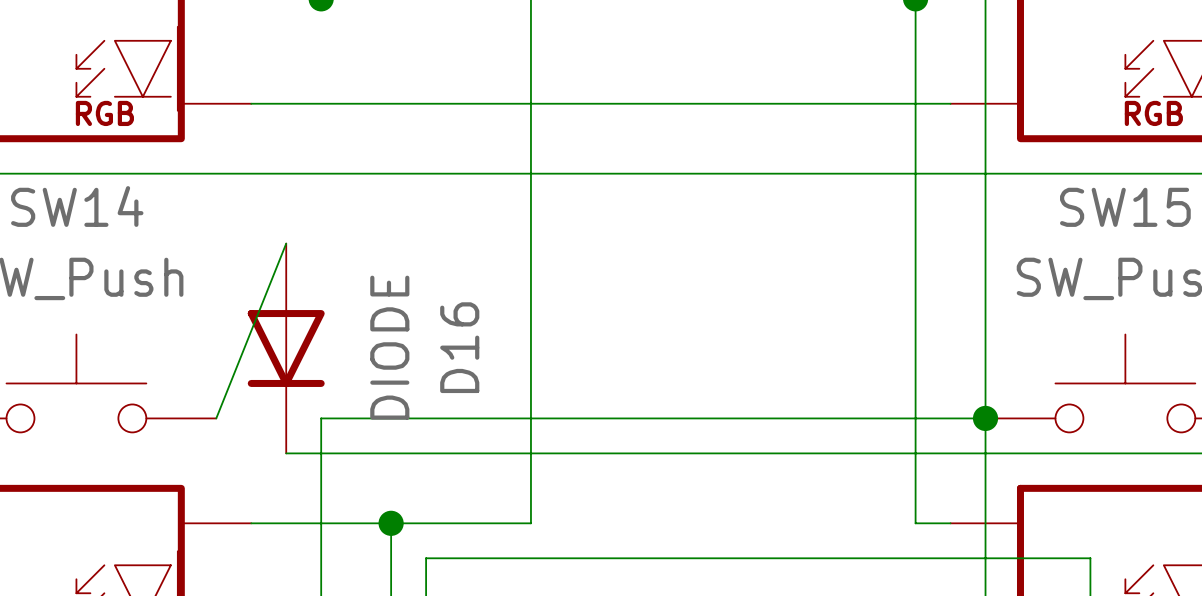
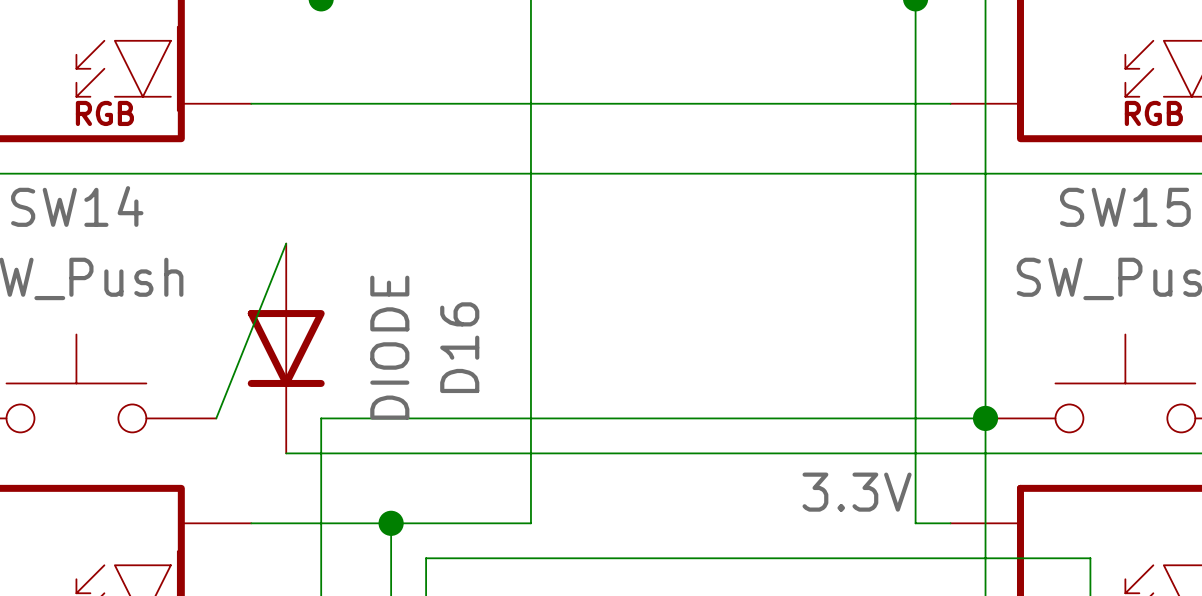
label: none -> 3.3V (857, 492)

